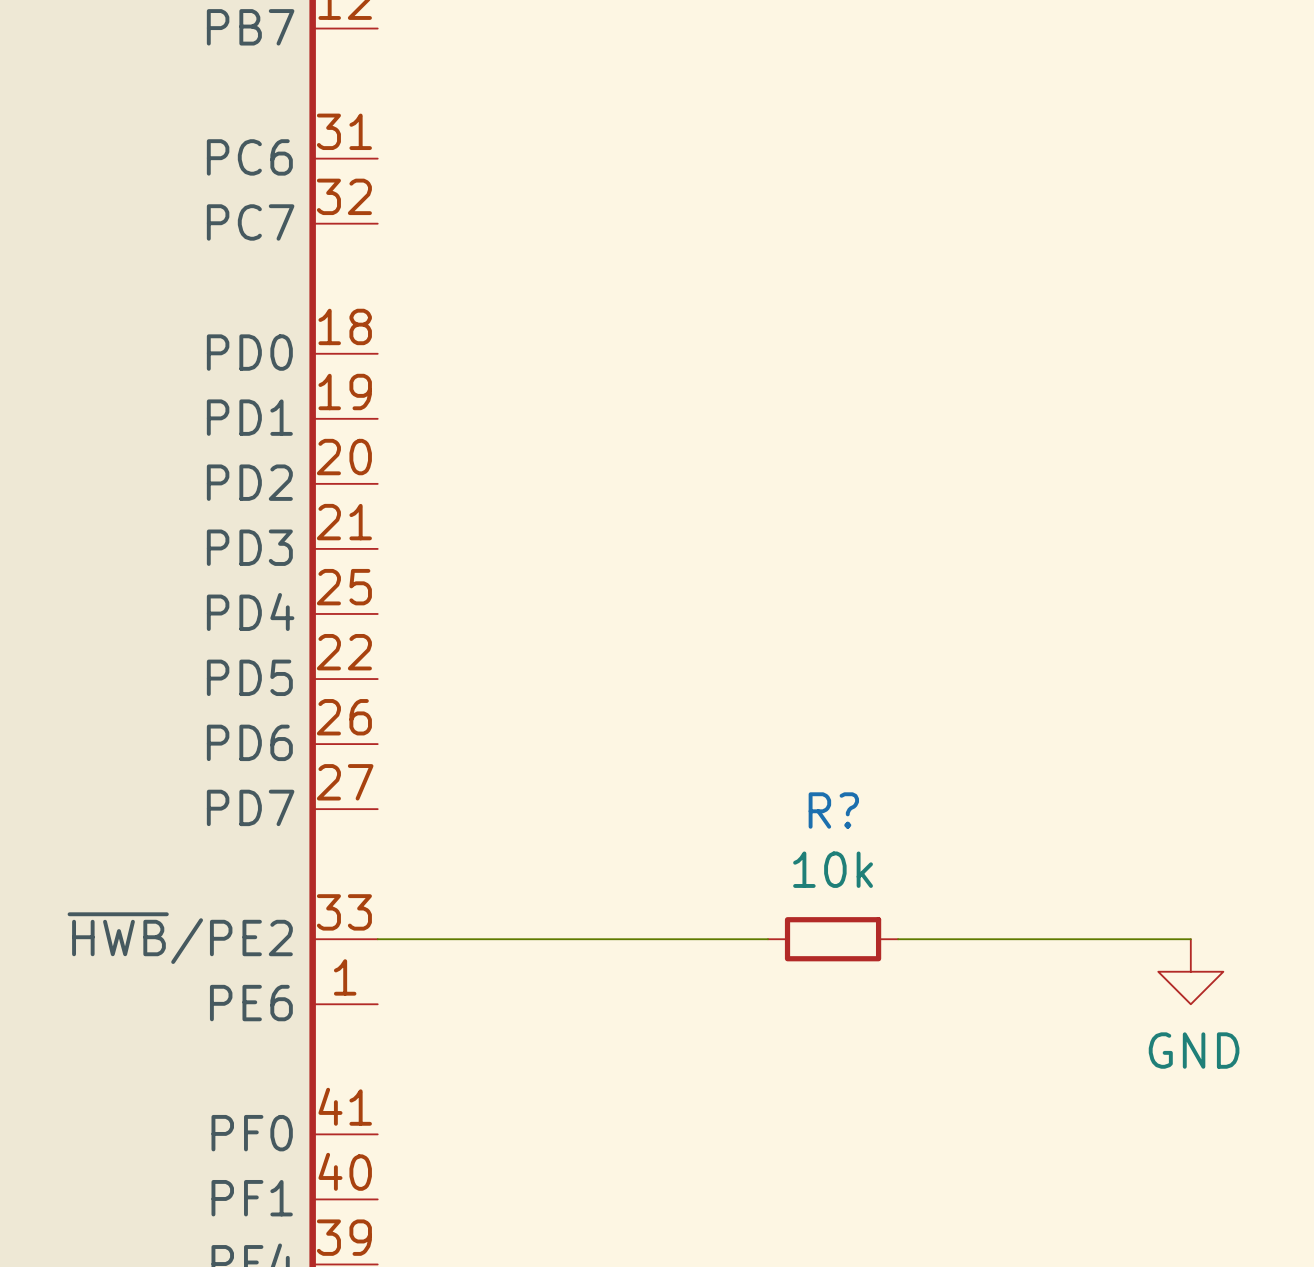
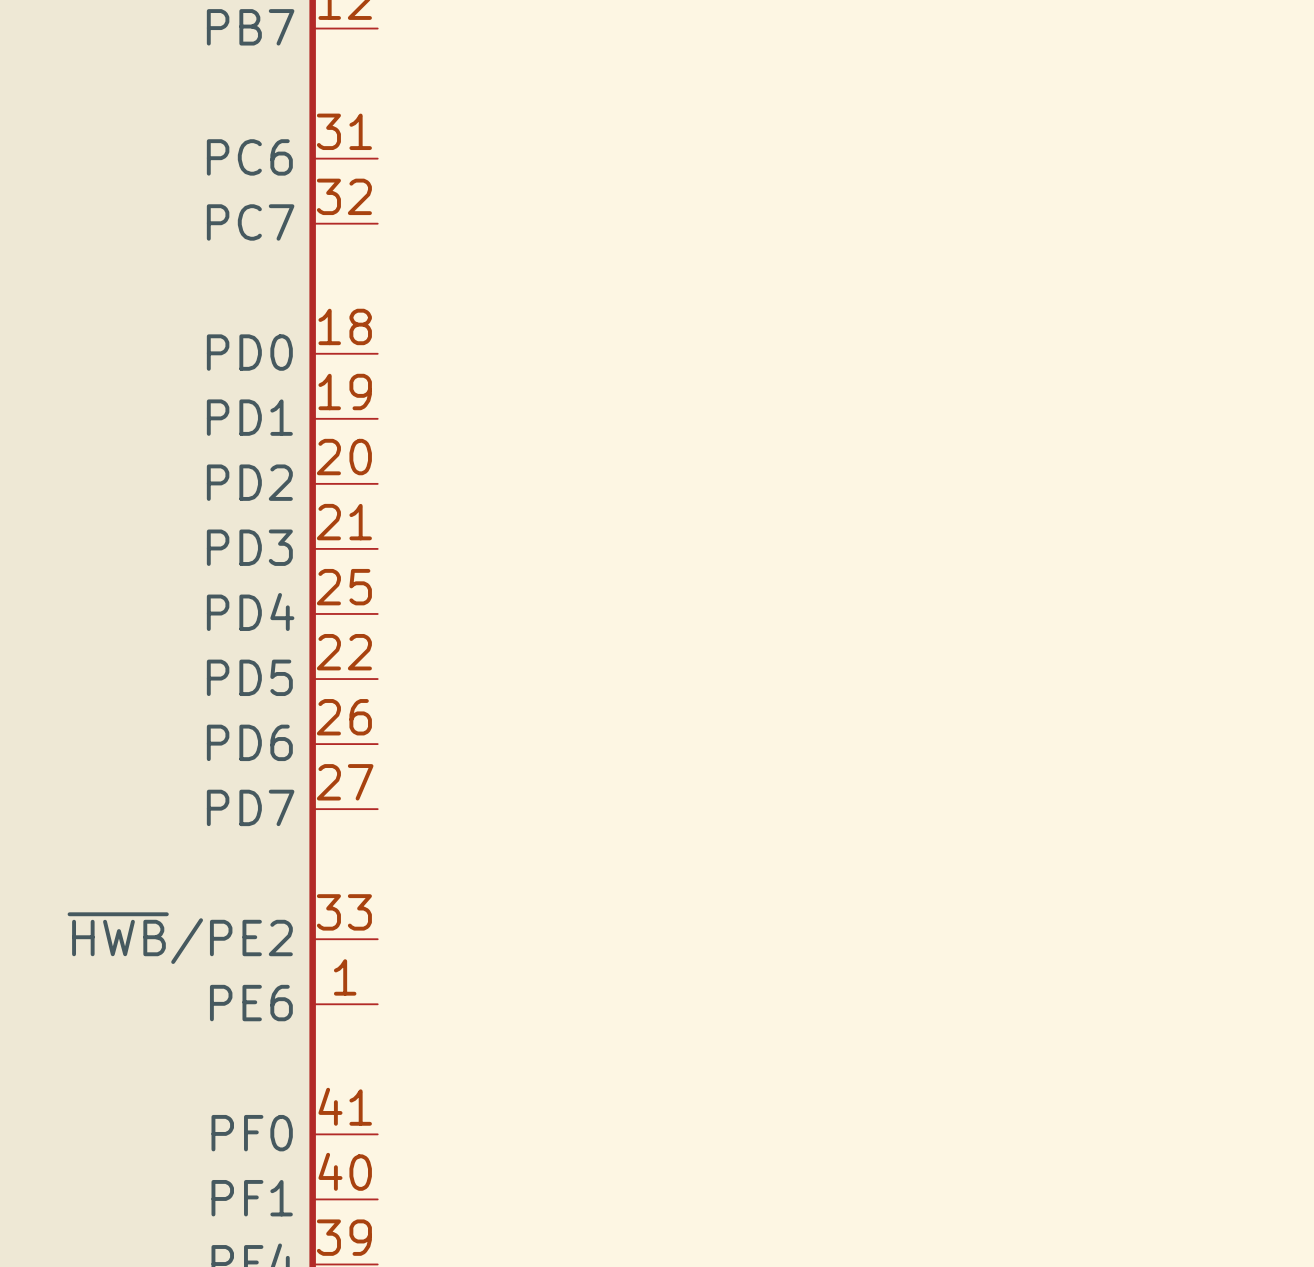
wire: (377, 939) (768, 939) -> none
R?: 10k (833, 939) -> none
wire: (898, 939) (1190, 939) -> none
power symbol: GND (1190, 971) -> none

